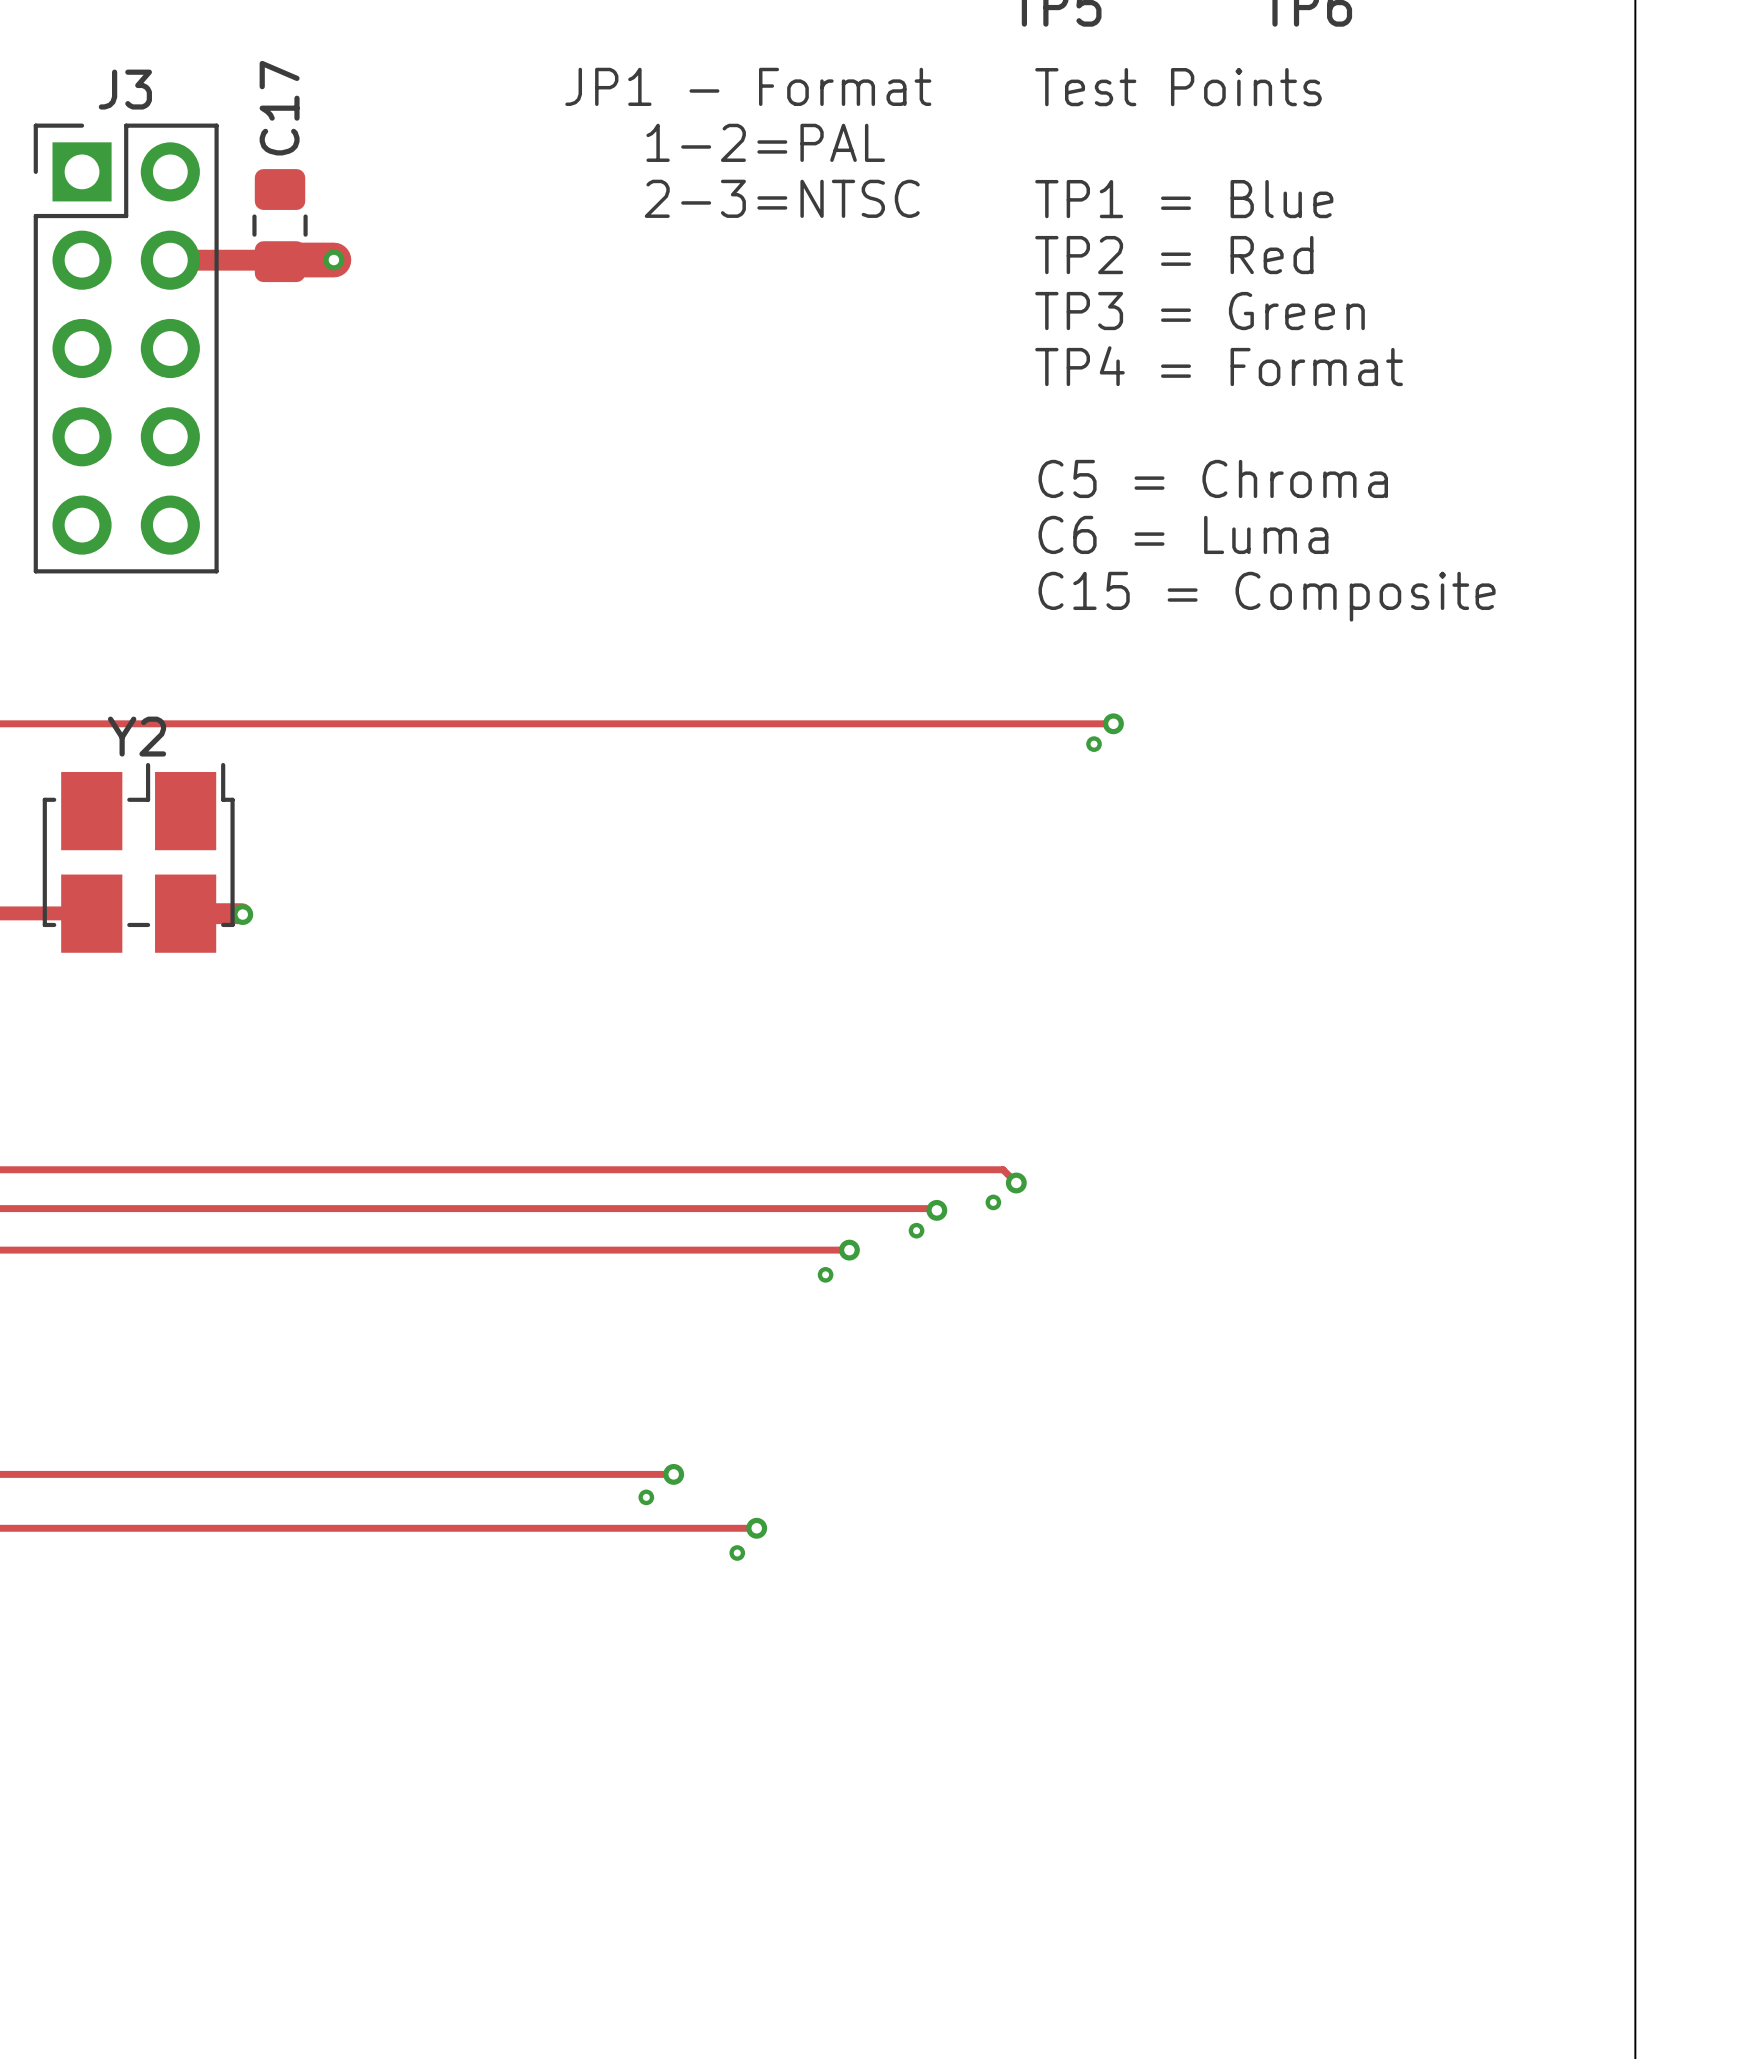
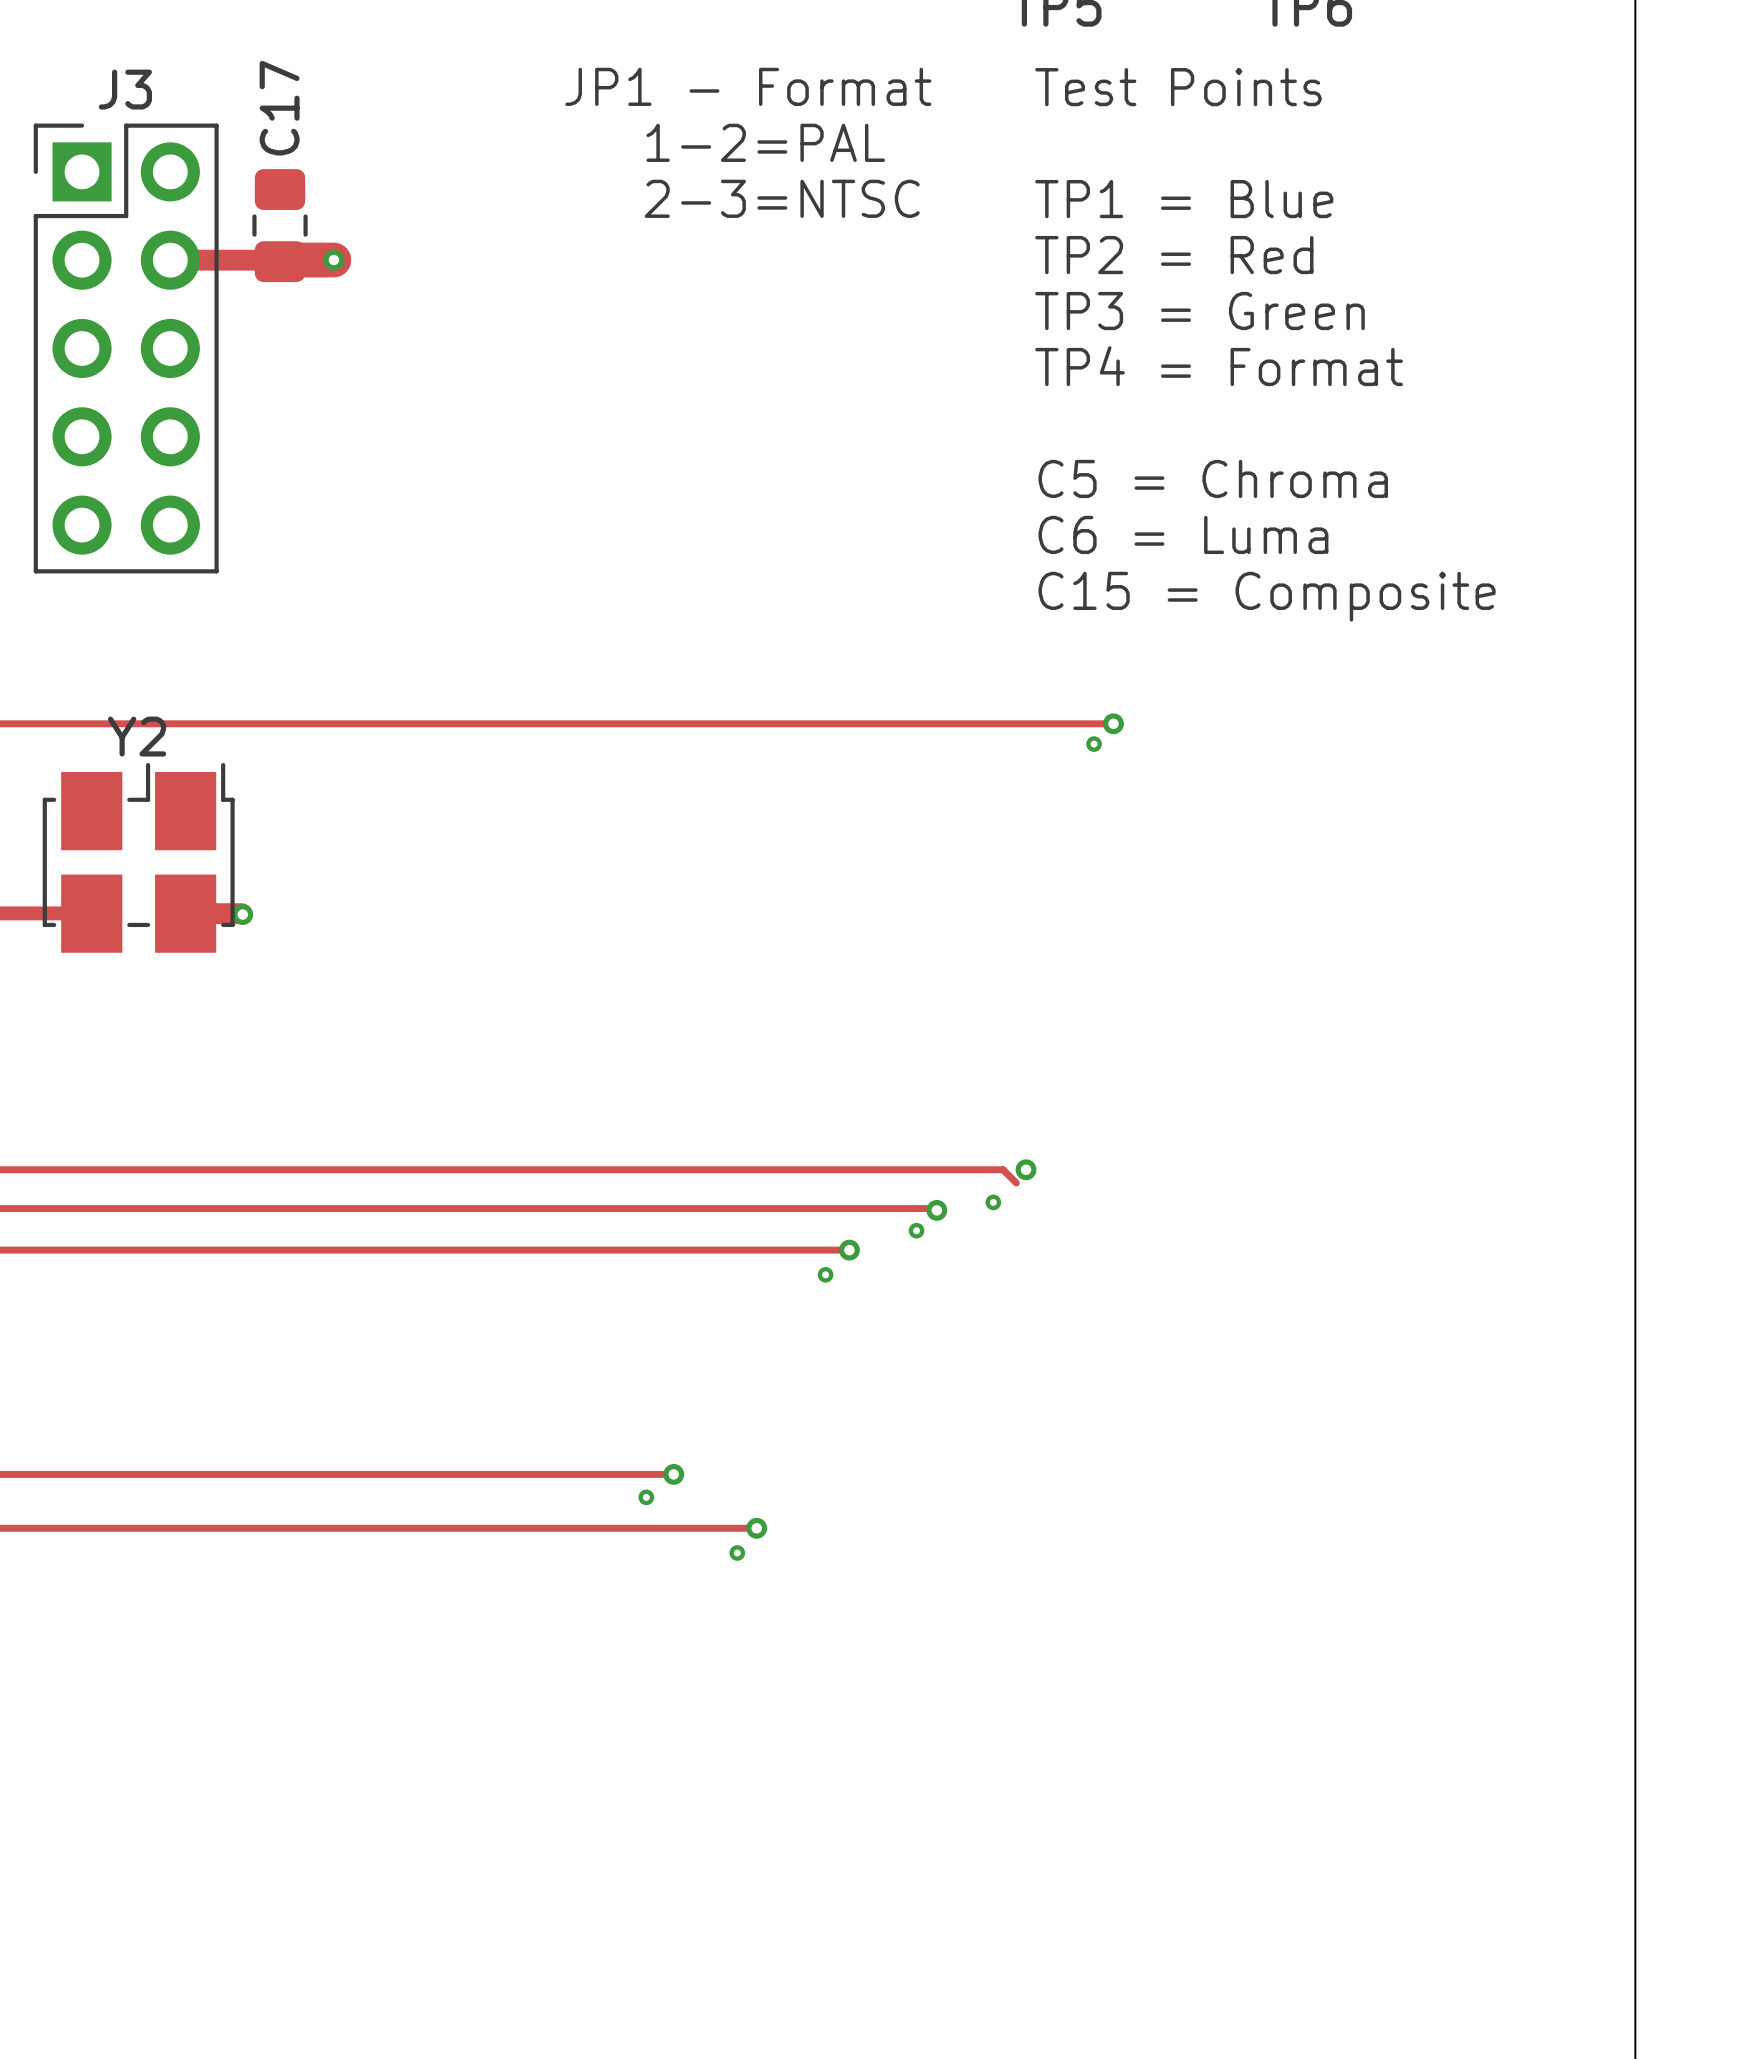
via position: (1016, 1182) -> (1026, 1169)

